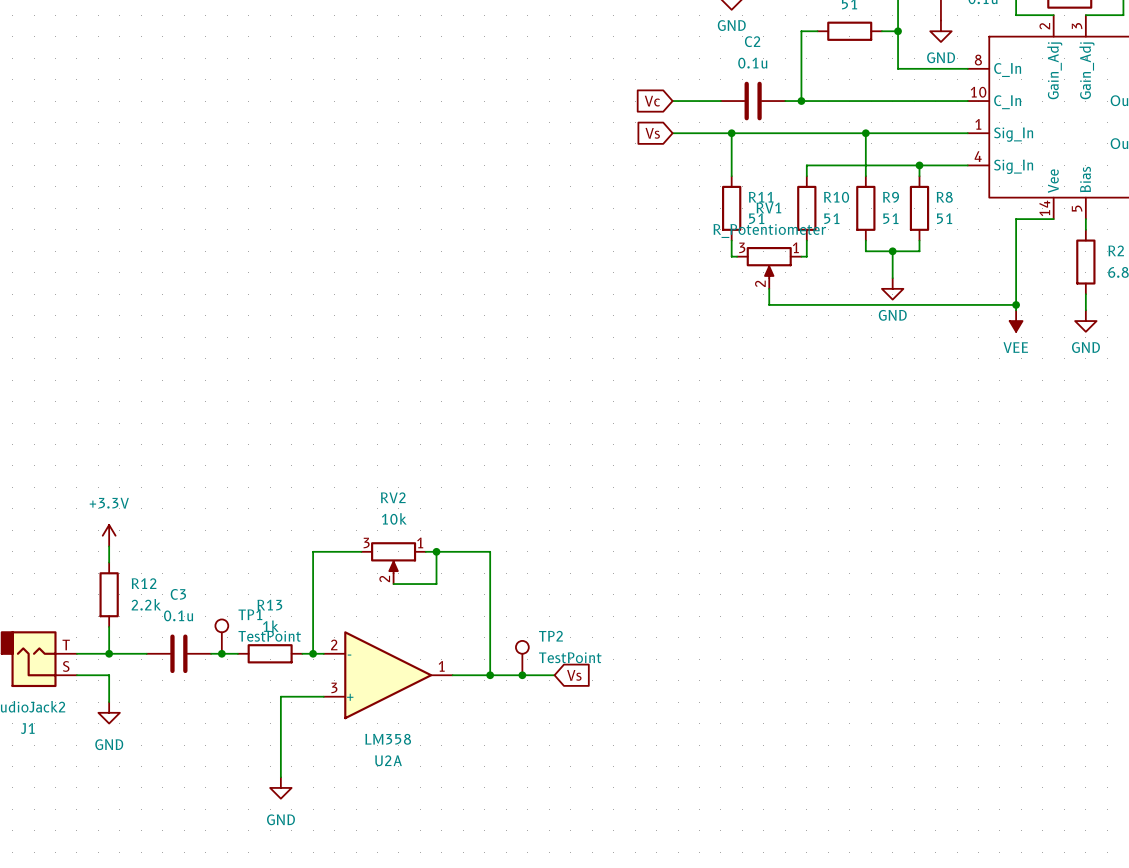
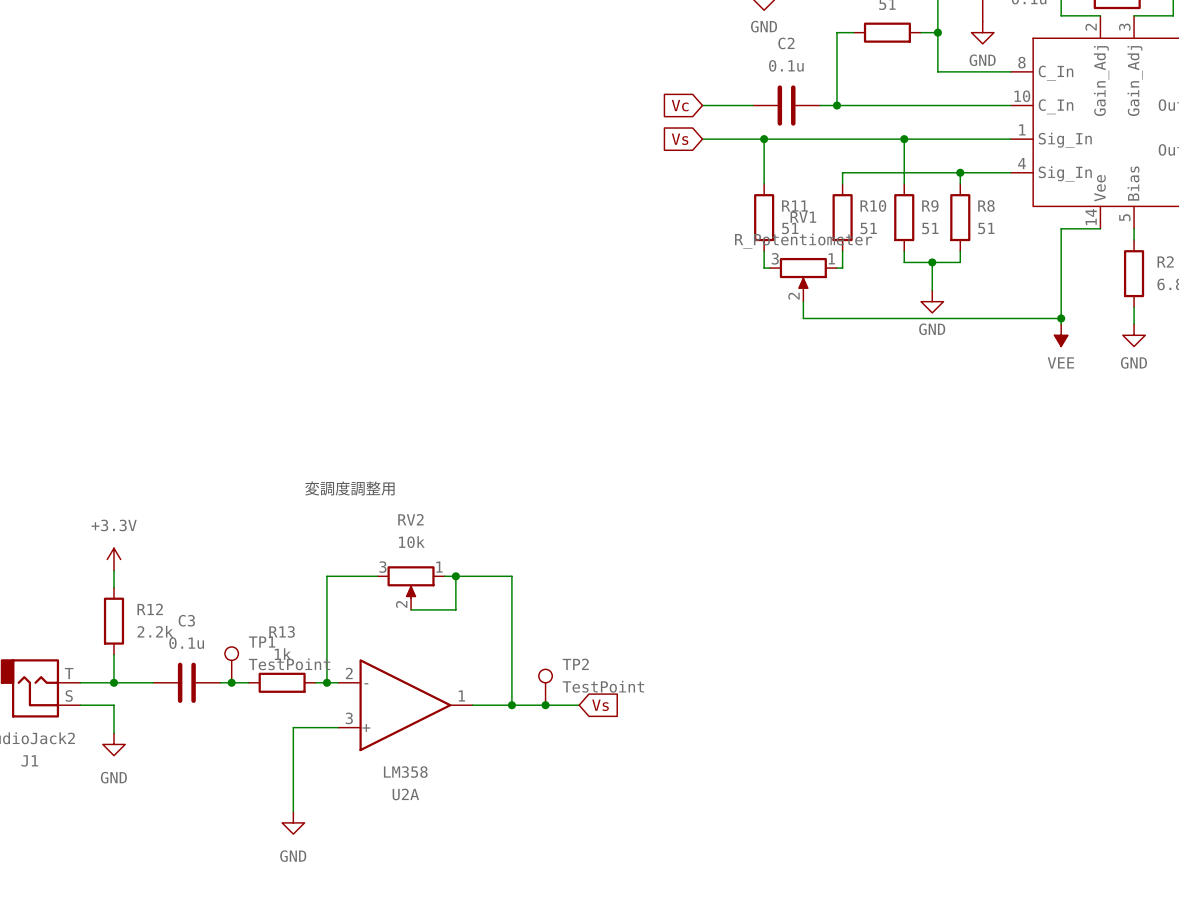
text: none -> 変調度調整用 (349, 488)

